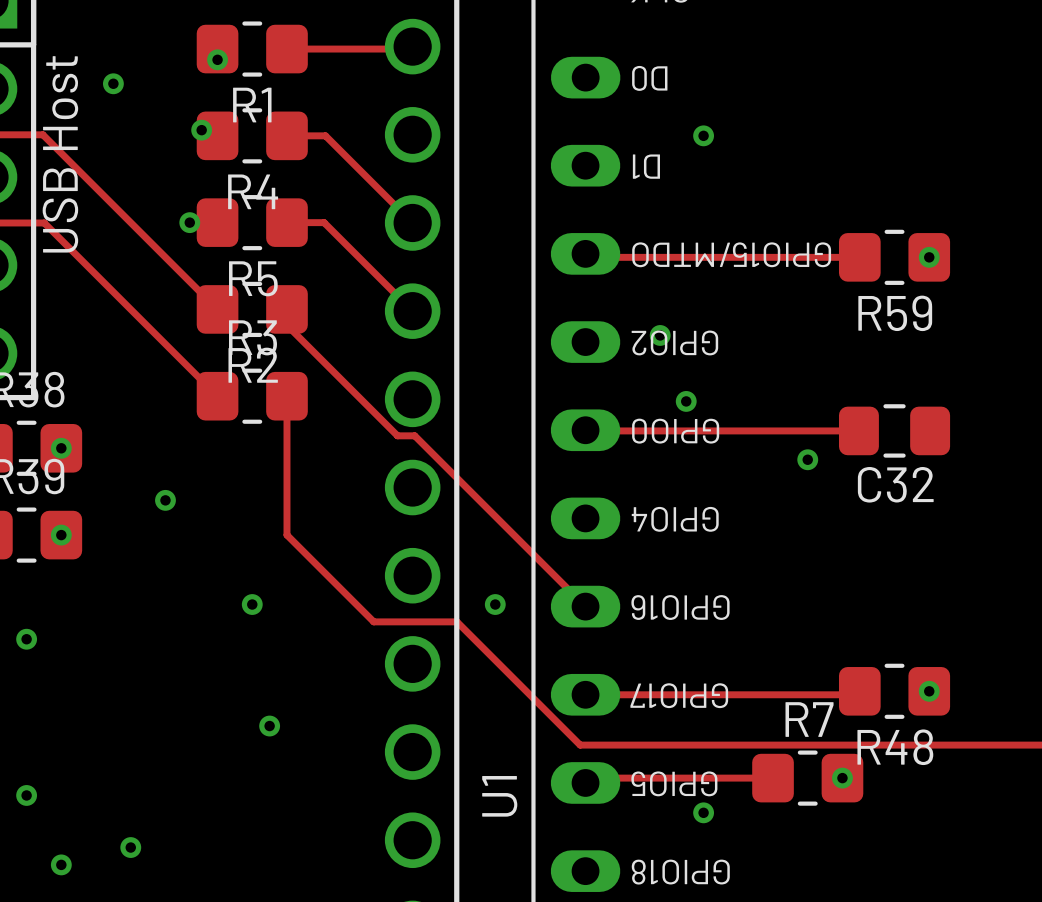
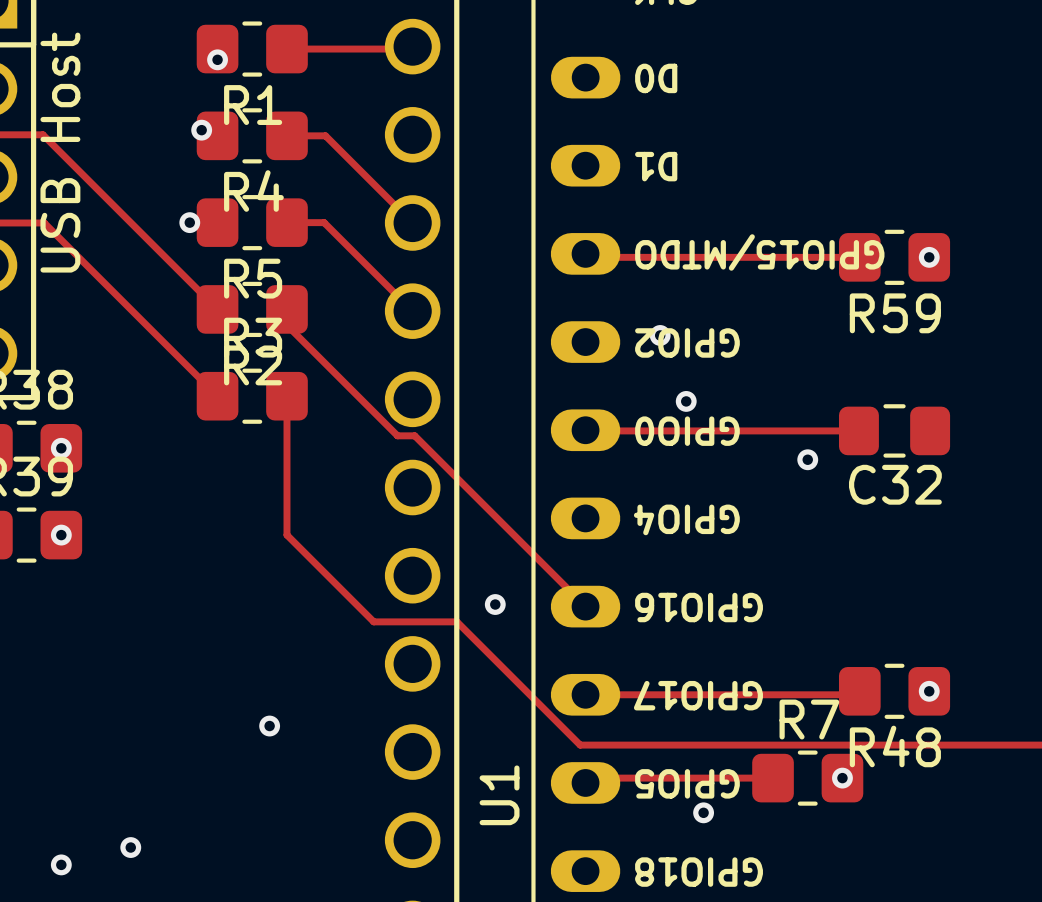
via: (113, 83) -> none
via: (703, 135) -> none
via: (165, 500) -> none
via: (252, 604) -> none
via: (26, 639) -> none
via: (26, 795) -> none

